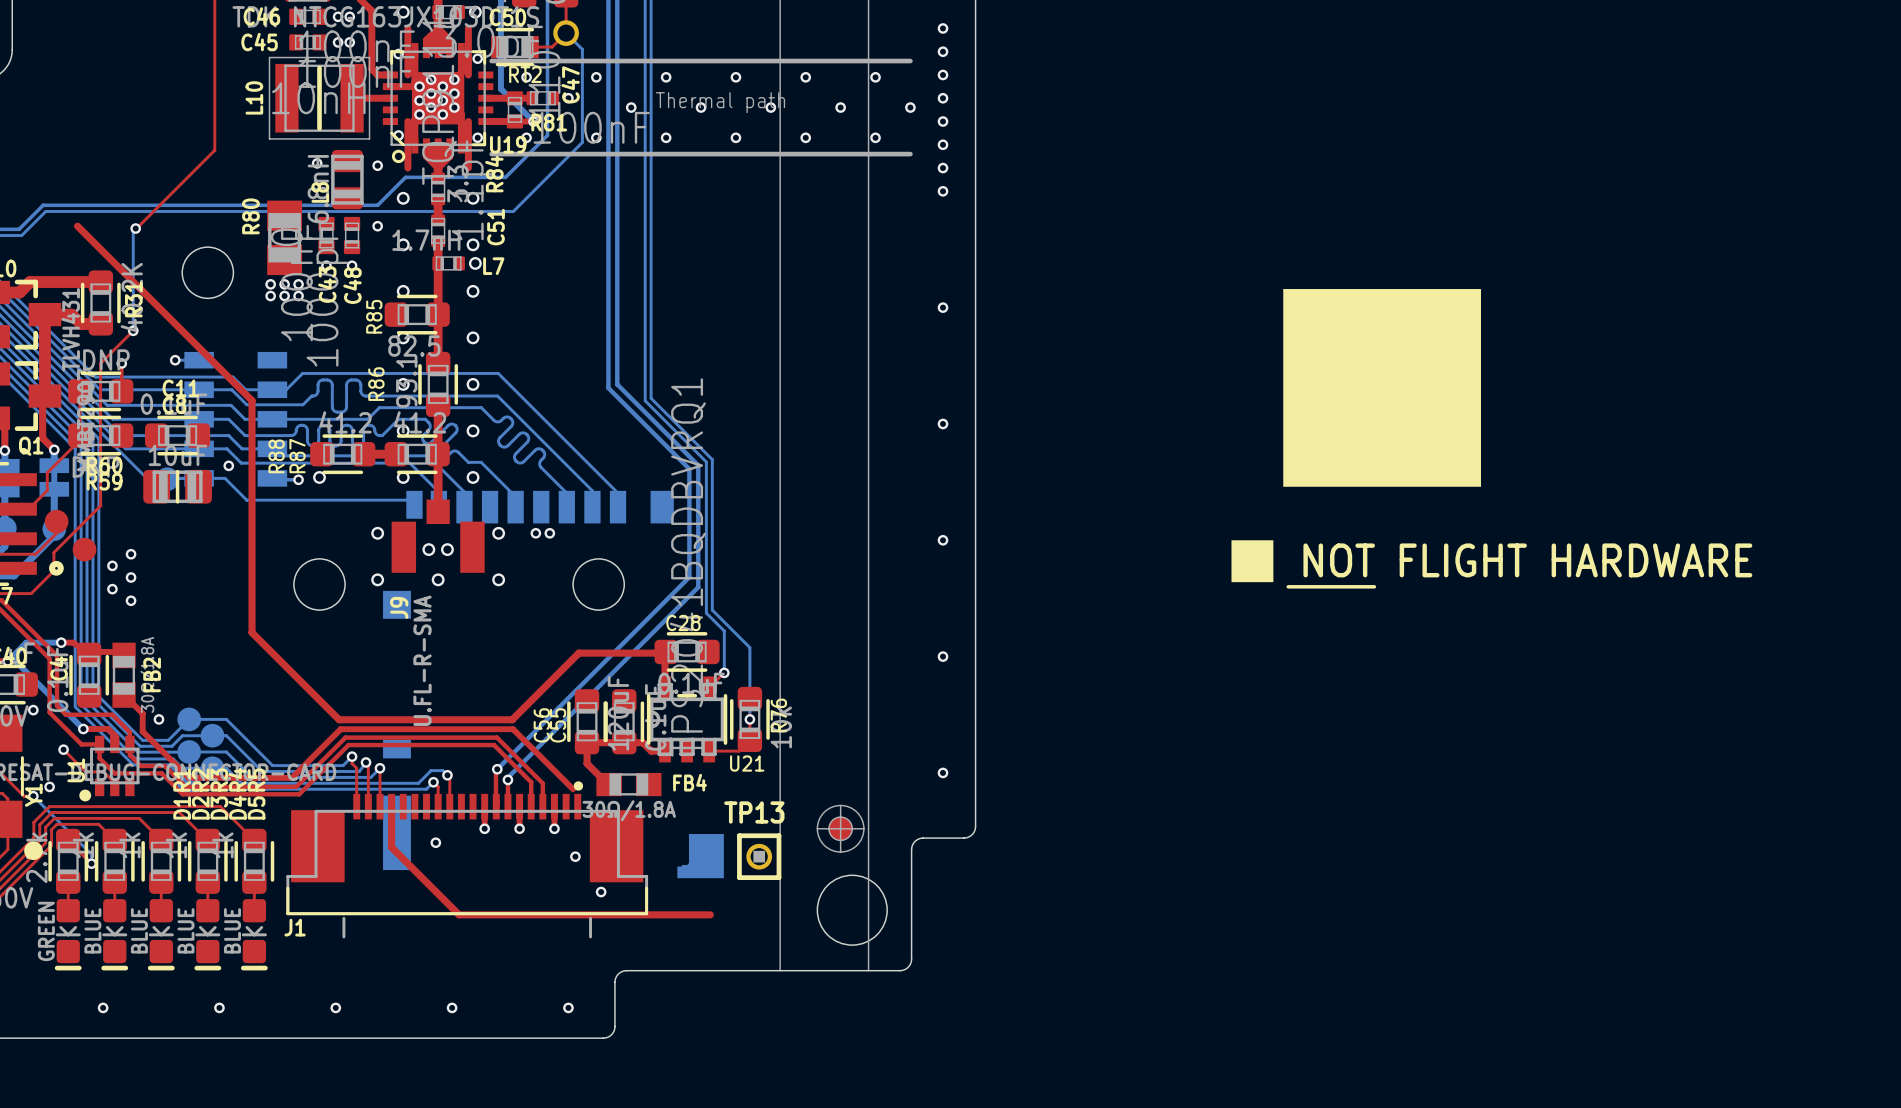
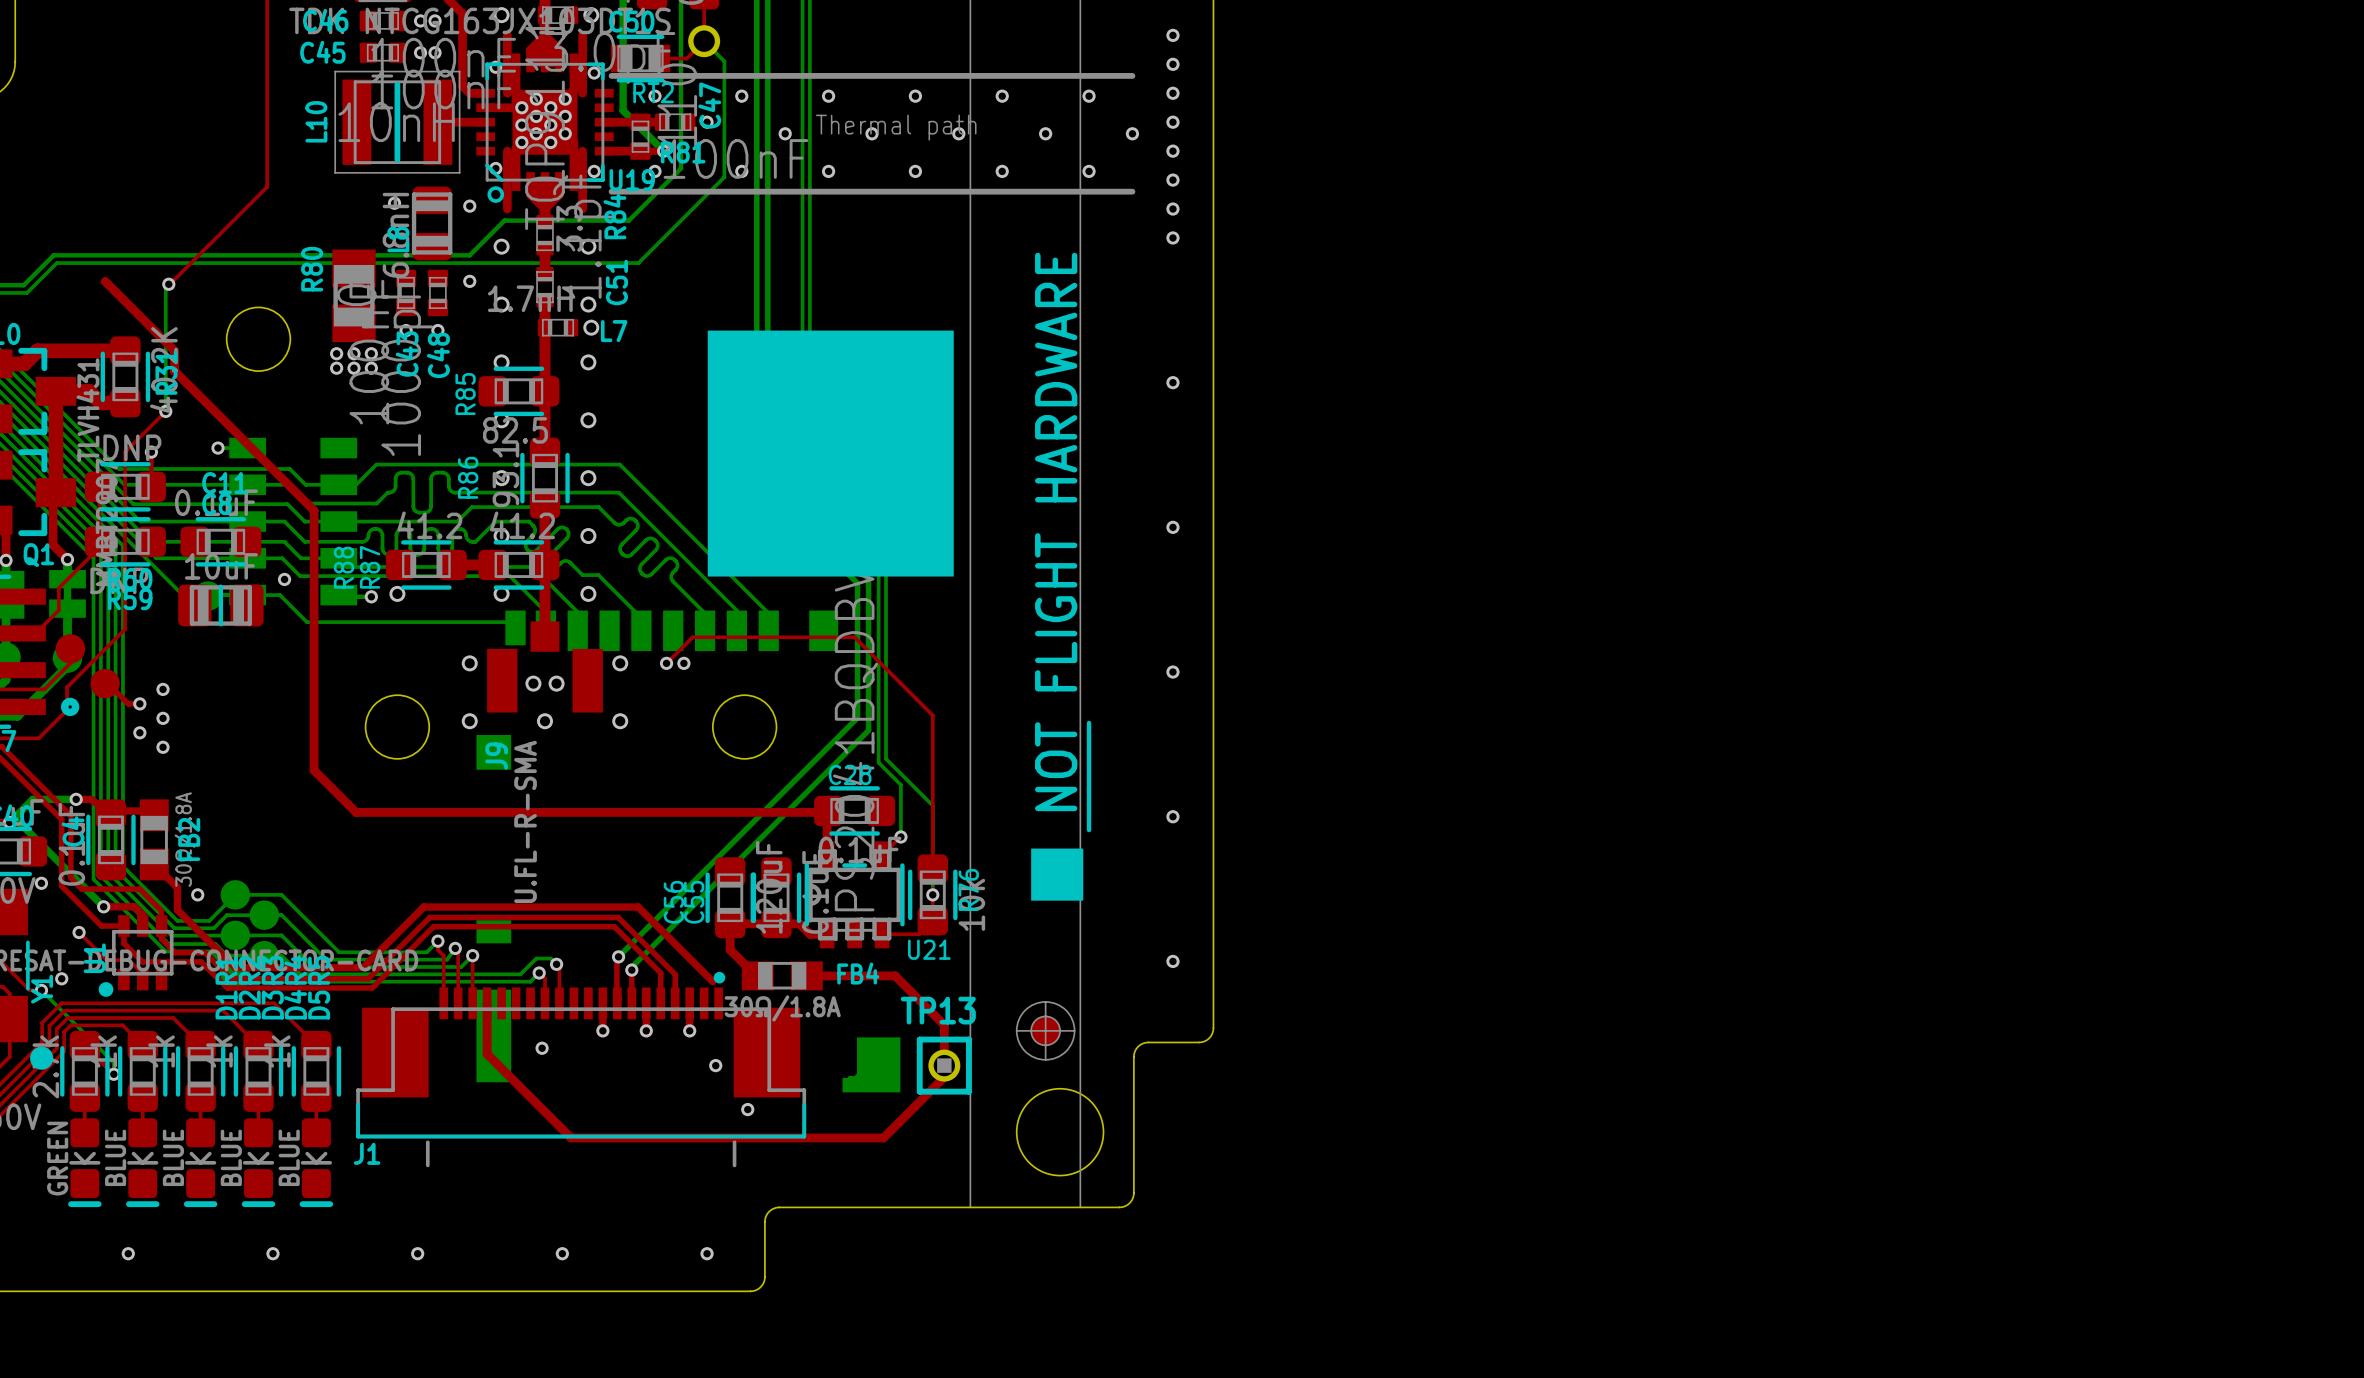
top track: (77, 226) (252, 400) (252, 632) (339, 719) (512, 719) (578, 653) -> (105, 281) (174, 350) (174, 371) (314, 510) (314, 770) (356, 812) (720, 812)
drawing: none -> [707, 330, 954, 577]
drawing: [1283, 289, 1482, 487] -> none
top track: none -> (666, 663) (692, 637) (854, 637) (932, 715) (932, 868)
drawing: [1231, 540, 1377, 589] -> none
top track: none -> (105, 683) (108, 683) (128, 703) (139, 703)
drawing: none -> [1031, 720, 1092, 901]
top track: none -> (806, 975) (895, 975) (944, 1025) (944, 1077) (883, 1137)

